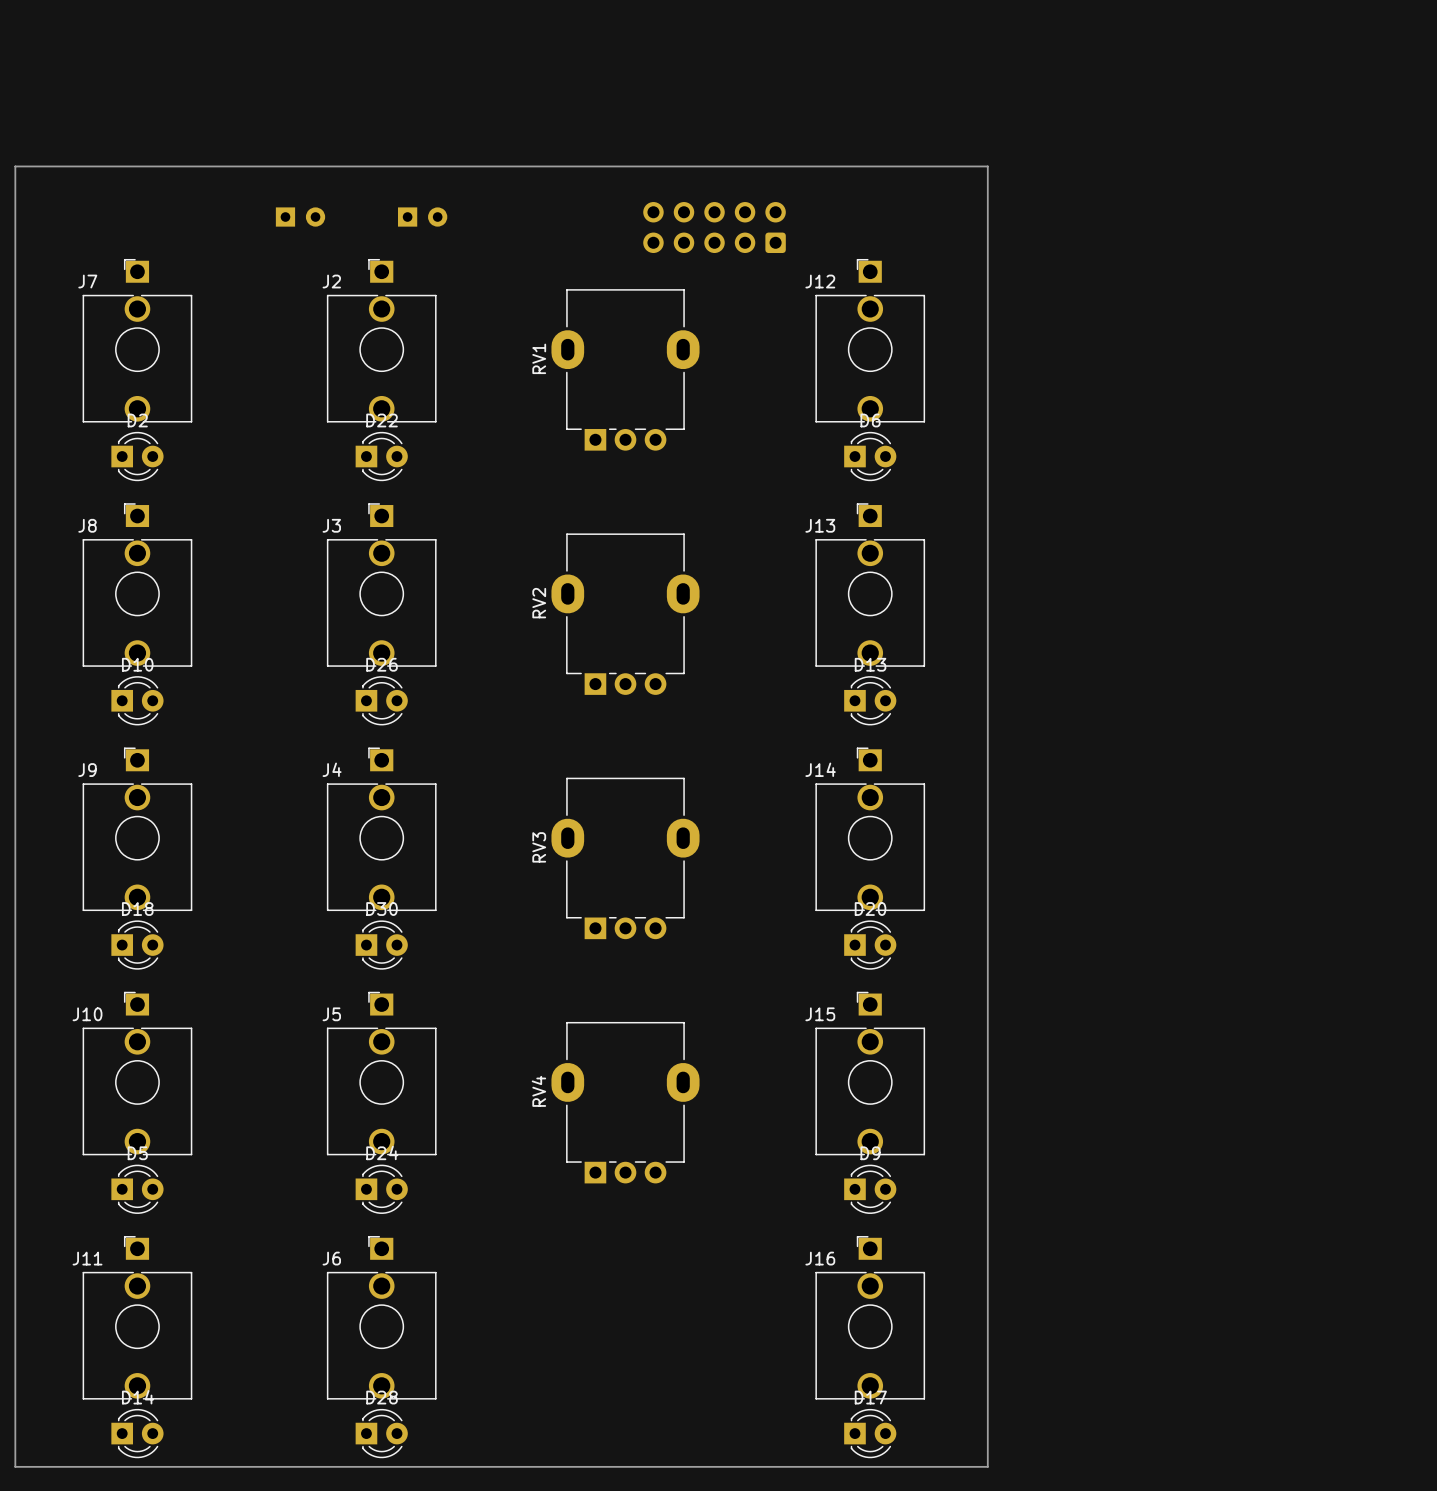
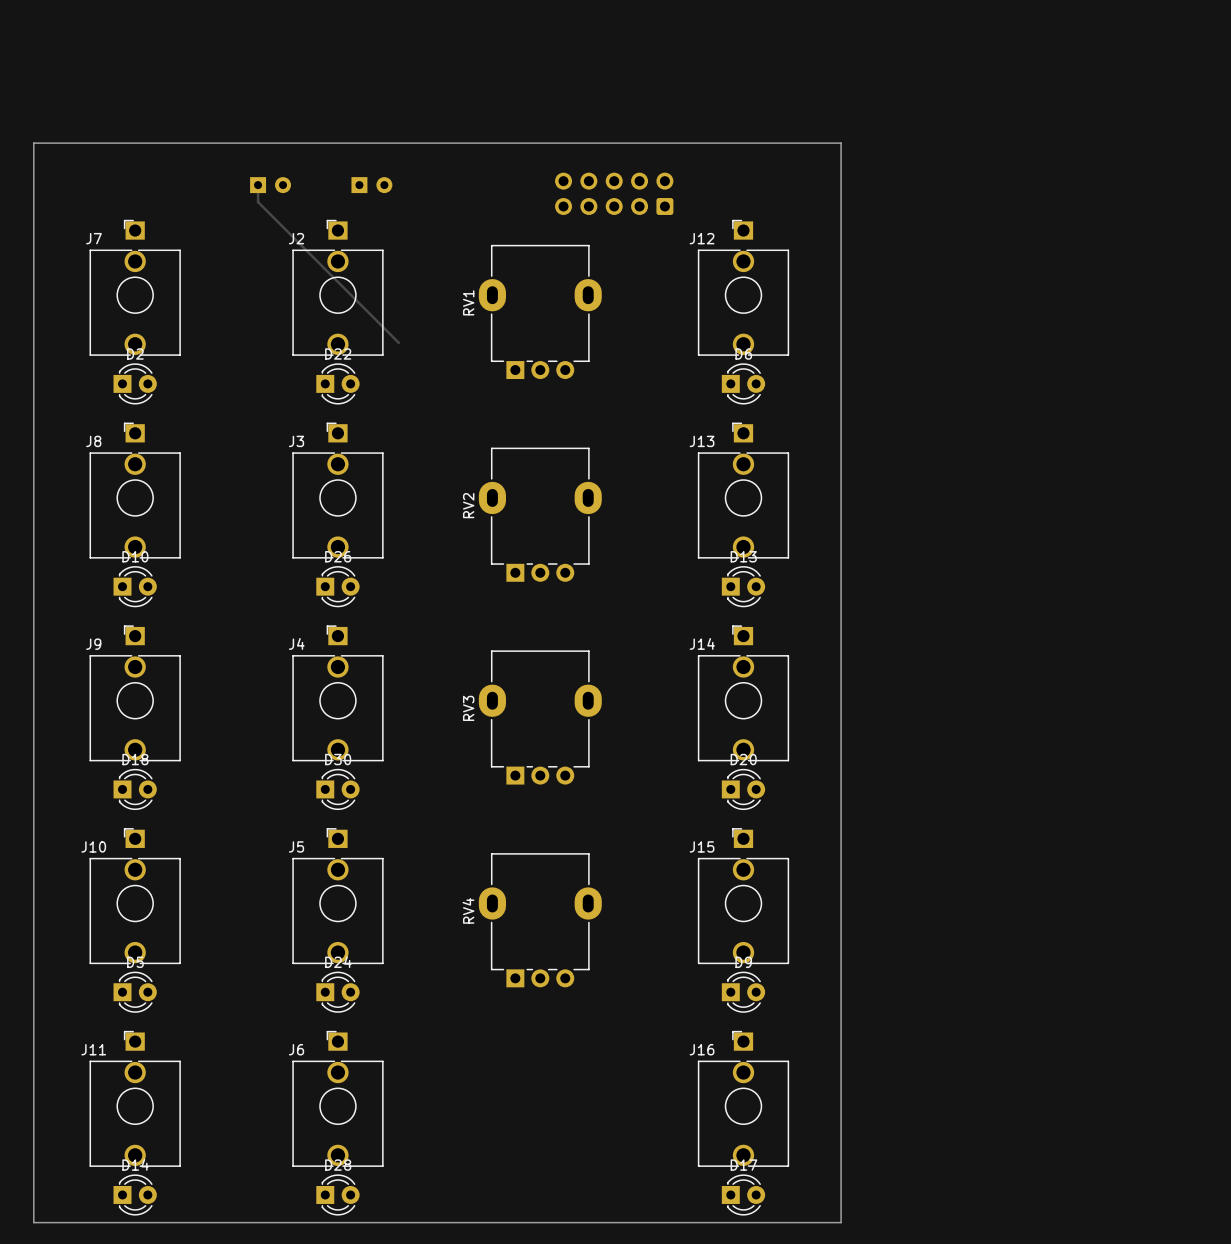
track: none -> (258, 185) (258, 202) (398, 342)

